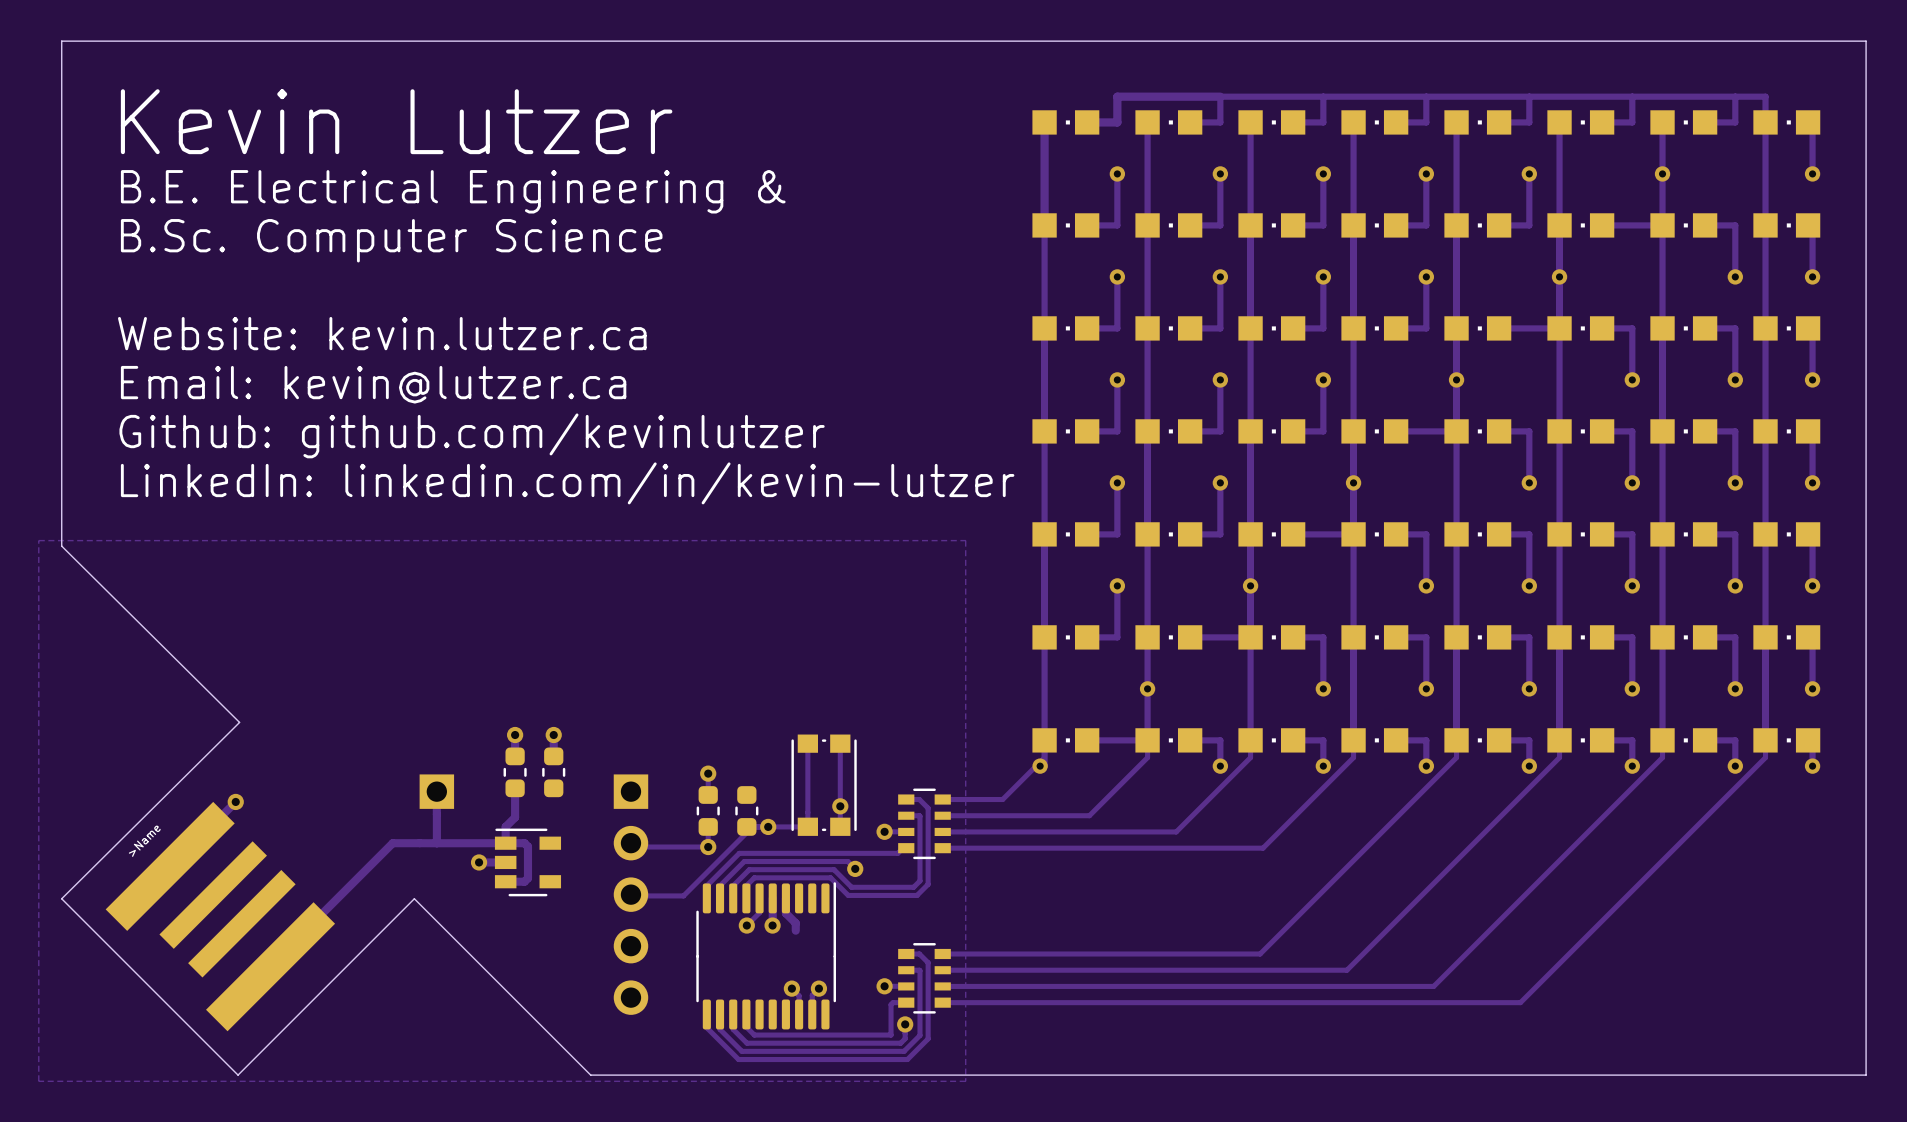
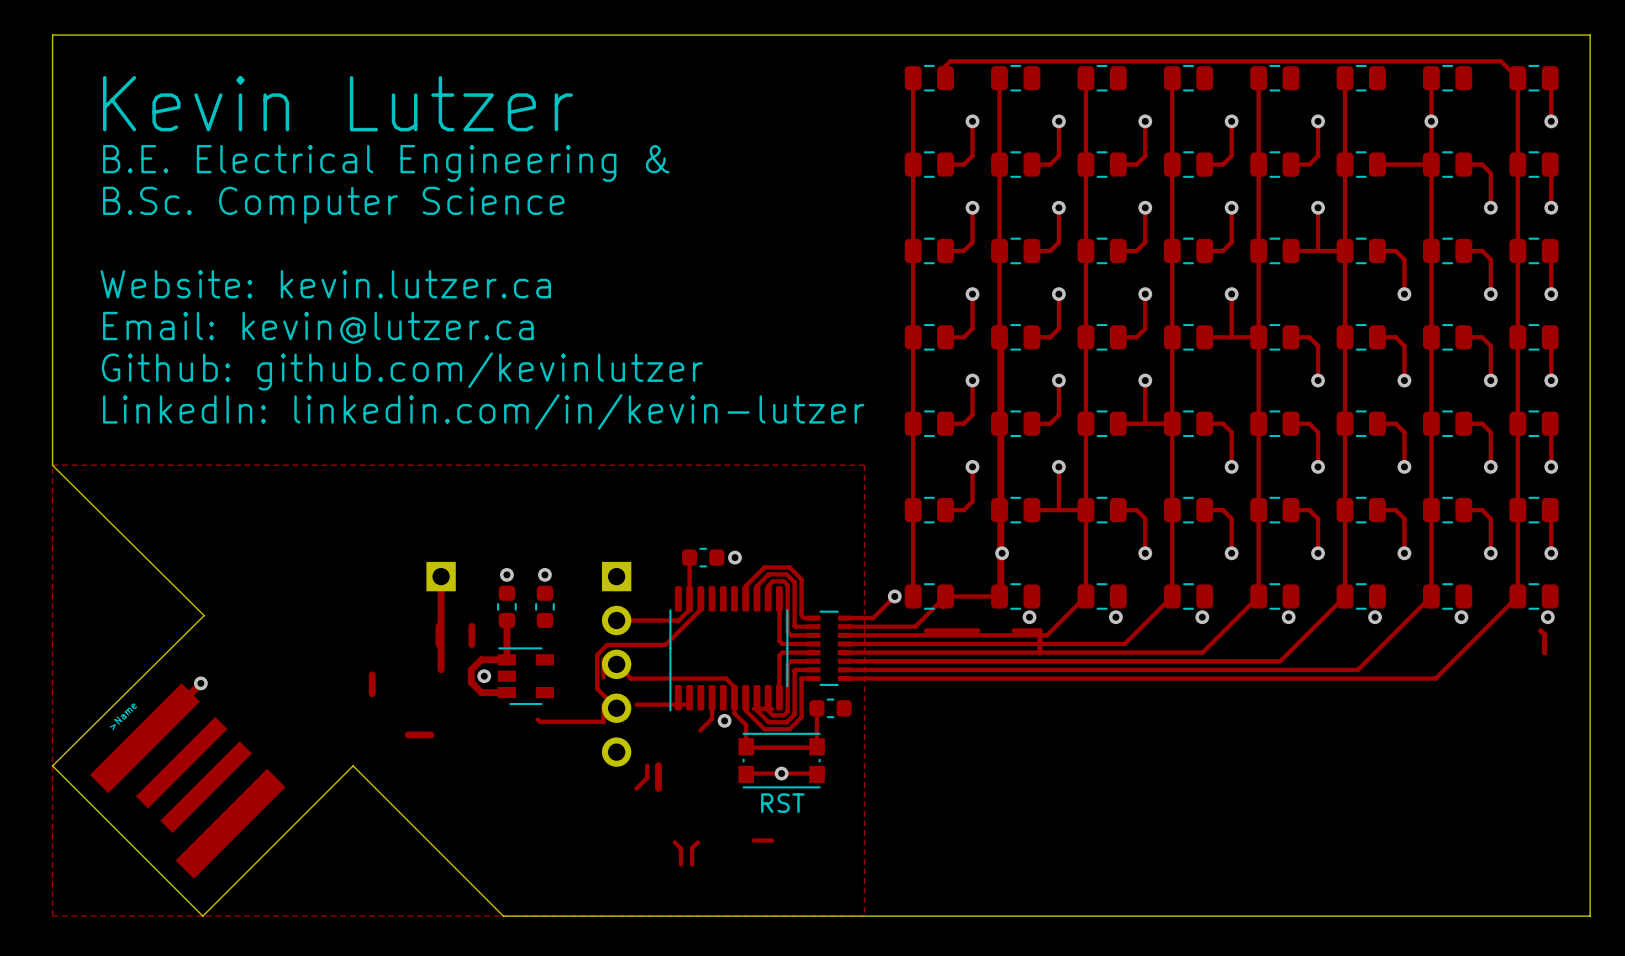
track: none -> (913, 78) (913, 596)
part: none -> (929, 78)
track: none -> (945, 78) (945, 66) (950, 61) (1500, 61) (1517, 78) (1517, 596) (1435, 678) (844, 678)
track: none -> (999, 78) (999, 596)
part: none -> (1015, 78)
track: none -> (1085, 78) (1085, 596) (1047, 635) (844, 635)
part: none -> (1102, 78)
track: none -> (1172, 78) (1172, 596) (1124, 643) (844, 643)
part: none -> (1188, 78)
track: none -> (1258, 78) (1258, 596) (1202, 652) (844, 652)
part: none -> (1274, 78)
track: none -> (1345, 78) (1345, 596) (1280, 661) (844, 661)
part: none -> (1361, 78)
track: none -> (1431, 78) (1431, 596) (1357, 669) (844, 669)
part: none -> (1447, 78)
part: none -> (1533, 78)
track: none -> (1547, 78) (1551, 81) (1551, 121)
track: (1220, 96) (1220, 122) (1190, 122) -> none
track: (1220, 96) (1765, 96) (1765, 757) (1520, 1002) (942, 1002) -> none
track: (1220, 96) (1117, 96) (1117, 122) (1087, 122) -> none
track: (1323, 96) (1323, 122) (1293, 122) -> none
track: (1426, 96) (1426, 122) (1396, 122) -> none
track: (1529, 96) (1529, 122) (1499, 122) -> none
track: (1632, 96) (1632, 122) (1602, 122) -> none
track: (1735, 96) (1735, 122) (1705, 122) -> none
track: (1044, 122) (1044, 766) (1040, 766) -> none
part: (1065, 122) -> none
track: (1147, 122) (1147, 757) (1089, 815) (942, 815) -> none
part: (1168, 122) -> none
track: (1250, 122) (1250, 757) (1176, 831) (942, 831) -> none
part: (1271, 122) -> none
track: (1353, 122) (1353, 757) (1263, 848) (942, 848) -> none
part: (1374, 122) -> none
track: (1456, 122) (1456, 757) (1260, 953) (942, 953) -> none
part: (1477, 122) -> none
track: (1559, 122) (1559, 757) (1346, 970) (942, 970) -> none
part: (1580, 122) -> none
track: (1662, 122) (1662, 757) (1433, 986) (942, 986) -> none
part: (1683, 122) -> none
part: (1786, 122) -> none
track: (1808, 122) (1812, 122) (1812, 173) -> none
track: none -> (972, 121) (972, 155) (963, 164) (942, 164)
via: none -> (972, 121)
track: none -> (1058, 121) (1058, 155) (1050, 164) (1029, 164)
via: none -> (1058, 121)
track: none -> (1145, 121) (1145, 155) (1136, 164) (1115, 164)
via: none -> (1145, 121)
track: none -> (1231, 121) (1231, 155) (1223, 164) (1202, 164)
via: none -> (1231, 121)
track: none -> (1318, 121) (1318, 155) (1309, 164) (1288, 164)
via: none -> (1318, 121)
via: none -> (1431, 121)
via: none -> (1551, 121)
track: (1117, 173) (1117, 225) (1087, 225) -> none
via: (1117, 173) -> none
track: (1220, 173) (1220, 225) (1190, 225) -> none
via: (1220, 173) -> none
track: (1323, 173) (1323, 225) (1293, 225) -> none
via: (1323, 173) -> none
track: (1426, 173) (1426, 225) (1396, 225) -> none
via: (1426, 173) -> none
track: (1529, 173) (1529, 225) (1499, 225) -> none
via: (1529, 173) -> none
via: (1662, 173) -> none
via: (1812, 173) -> none
part: none -> (929, 164)
part: none -> (1015, 164)
part: none -> (1102, 164)
part: none -> (1188, 164)
part: none -> (1274, 164)
part: none -> (1361, 164)
track: none -> (1374, 164) (1434, 164)
part: none -> (1447, 164)
track: none -> (1463, 164) (1482, 164) (1490, 173) (1490, 207)
part: none -> (1533, 164)
track: none -> (1547, 164) (1551, 168) (1551, 207)
part: (1065, 225) -> none
part: (1168, 225) -> none
part: (1271, 225) -> none
part: (1374, 225) -> none
part: (1477, 225) -> none
part: (1580, 225) -> none
track: (1602, 225) (1662, 225) -> none
part: (1683, 225) -> none
track: (1705, 225) (1735, 225) (1735, 276) -> none
part: (1786, 225) -> none
track: (1808, 225) (1812, 225) (1812, 276) -> none
track: none -> (972, 207) (972, 242) (963, 250) (942, 250)
via: none -> (972, 207)
track: none -> (1058, 207) (1058, 242) (1050, 250) (1029, 250)
via: none -> (1058, 207)
track: none -> (1145, 207) (1145, 242) (1136, 250) (1115, 250)
via: none -> (1145, 207)
track: none -> (1231, 207) (1231, 242) (1223, 250) (1202, 250)
via: none -> (1231, 207)
track: none -> (1318, 207) (1318, 250)
via: none -> (1318, 207)
via: none -> (1490, 207)
via: none -> (1551, 207)
track: (1117, 276) (1117, 328) (1087, 328) -> none
via: (1117, 276) -> none
track: (1220, 276) (1220, 328) (1190, 328) -> none
via: (1220, 276) -> none
track: (1323, 276) (1323, 328) (1293, 328) -> none
via: (1323, 276) -> none
track: (1426, 276) (1426, 328) (1396, 328) -> none
via: (1426, 276) -> none
via: (1559, 276) -> none
via: (1735, 276) -> none
via: (1812, 276) -> none
part: none -> (929, 250)
part: none -> (1015, 250)
part: none -> (1102, 250)
part: none -> (1188, 250)
part: none -> (1274, 250)
track: none -> (1288, 250) (1347, 250)
part: none -> (1361, 250)
track: none -> (1377, 250) (1395, 250) (1404, 259) (1404, 294)
part: none -> (1447, 250)
track: none -> (1463, 250) (1482, 250) (1490, 259) (1490, 294)
part: none -> (1533, 250)
track: none -> (1547, 250) (1551, 254) (1551, 294)
part: (1065, 328) -> none
part: (1168, 328) -> none
part: (1271, 328) -> none
part: (1374, 328) -> none
part: (1477, 328) -> none
track: (1499, 328) (1559, 328) -> none
part: (1580, 328) -> none
track: (1602, 328) (1632, 328) (1632, 379) -> none
part: (1683, 328) -> none
track: (1705, 328) (1735, 328) (1735, 379) -> none
part: (1786, 328) -> none
track: (1808, 328) (1812, 328) (1812, 379) -> none
track: none -> (972, 294) (972, 328) (963, 337) (942, 337)
via: none -> (972, 294)
track: none -> (1058, 294) (1058, 328) (1050, 337) (1029, 337)
via: none -> (1058, 294)
track: none -> (1145, 294) (1145, 328) (1136, 337) (1115, 337)
via: none -> (1145, 294)
track: none -> (1231, 294) (1231, 337)
via: none -> (1231, 294)
via: none -> (1404, 294)
via: none -> (1490, 294)
via: none -> (1551, 294)
track: (1117, 379) (1117, 431) (1087, 431) -> none
via: (1117, 379) -> none
track: (1220, 379) (1220, 431) (1190, 431) -> none
via: (1220, 379) -> none
track: (1323, 379) (1323, 431) (1293, 431) -> none
via: (1323, 379) -> none
via: (1456, 379) -> none
via: (1632, 379) -> none
via: (1735, 379) -> none
via: (1812, 379) -> none
track: none -> (1002, 330) (1002, 596) (942, 596) (942, 607)
part: none -> (929, 337)
part: none -> (1015, 337)
part: none -> (1102, 337)
part: none -> (1188, 337)
track: none -> (1202, 337) (1261, 337)
part: none -> (1274, 337)
track: none -> (1291, 337) (1309, 337) (1318, 345) (1318, 380)
part: none -> (1361, 337)
track: none -> (1377, 337) (1395, 337) (1404, 345) (1404, 380)
part: none -> (1447, 337)
track: none -> (1463, 337) (1482, 337) (1490, 345) (1490, 380)
part: none -> (1533, 337)
track: none -> (1550, 337) (1551, 380)
part: (1065, 431) -> none
part: (1168, 431) -> none
part: (1271, 431) -> none
part: (1374, 431) -> none
track: (1396, 431) (1456, 431) -> none
part: (1477, 431) -> none
track: (1499, 431) (1529, 431) (1529, 482) -> none
part: (1580, 431) -> none
track: (1602, 431) (1632, 431) (1632, 482) -> none
part: (1683, 431) -> none
track: (1705, 431) (1735, 431) (1735, 482) -> none
part: (1786, 431) -> none
track: (1808, 431) (1812, 431) (1812, 482) -> none
track: none -> (972, 380) (972, 415) (963, 423) (942, 423)
via: none -> (972, 380)
track: none -> (1058, 380) (1058, 415) (1050, 423) (1029, 423)
via: none -> (1058, 380)
track: none -> (1145, 380) (1145, 423)
via: none -> (1145, 380)
via: none -> (1318, 380)
via: none -> (1404, 380)
via: none -> (1490, 380)
via: none -> (1551, 380)
track: (1117, 482) (1117, 534) (1087, 534) -> none
via: (1117, 482) -> none
track: (1220, 482) (1220, 534) (1190, 534) -> none
via: (1220, 482) -> none
via: (1353, 482) -> none
via: (1529, 482) -> none
via: (1632, 482) -> none
via: (1735, 482) -> none
via: (1812, 482) -> none
part: none -> (929, 423)
part: none -> (1015, 423)
part: none -> (1102, 423)
track: none -> (1115, 423) (1174, 423)
part: none -> (1188, 423)
track: none -> (1204, 423) (1223, 423) (1231, 432) (1231, 466)
part: none -> (1274, 423)
track: none -> (1291, 423) (1309, 423) (1318, 432) (1318, 466)
part: none -> (1361, 423)
track: none -> (1377, 423) (1395, 423) (1404, 432) (1404, 466)
part: none -> (1447, 423)
track: none -> (1463, 423) (1482, 423) (1490, 432) (1490, 466)
part: none -> (1533, 423)
track: none -> (1550, 423) (1551, 466)
part: (1065, 534) -> none
part: (1168, 534) -> none
part: (1271, 534) -> none
track: (1293, 534) (1353, 534) -> none
part: (1374, 534) -> none
track: (1396, 534) (1426, 534) (1426, 585) -> none
part: (1477, 534) -> none
track: (1499, 534) (1529, 534) (1529, 585) -> none
part: (1580, 534) -> none
track: (1602, 534) (1632, 534) (1632, 585) -> none
part: (1683, 534) -> none
track: (1705, 534) (1735, 534) (1735, 585) -> none
part: (1786, 534) -> none
track: (1808, 534) (1812, 534) (1812, 585) -> none
zone outline: (38, 540) (38, 1081) (965, 1081) (965, 540) (38, 540) -> (52, 465) (52, 916) (864, 916) (864, 465) (52, 465)
track: none -> (972, 466) (972, 501) (963, 510) (942, 510)
via: none -> (972, 466)
track: none -> (1058, 466) (1058, 510)
via: none -> (1058, 466)
via: none -> (1231, 466)
via: none -> (1318, 466)
via: none -> (1404, 466)
via: none -> (1490, 466)
via: none -> (1551, 466)
track: (1117, 585) (1117, 637) (1087, 637) -> none
via: (1117, 585) -> none
via: (1250, 585) -> none
via: (1426, 585) -> none
via: (1529, 585) -> none
via: (1632, 585) -> none
via: (1735, 585) -> none
via: (1812, 585) -> none
part: none -> (929, 510)
part: none -> (1015, 510)
track: none -> (1029, 510) (1088, 510)
part: none -> (1102, 510)
track: none -> (1118, 510) (1136, 510) (1145, 518) (1145, 553)
part: none -> (1188, 510)
track: none -> (1204, 510) (1223, 510) (1231, 518) (1231, 553)
part: none -> (1274, 510)
track: none -> (1291, 510) (1309, 510) (1318, 518) (1318, 553)
part: none -> (1361, 510)
track: none -> (1377, 510) (1395, 510) (1404, 518) (1404, 553)
part: none -> (1447, 510)
track: none -> (1463, 510) (1482, 510) (1490, 518) (1490, 553)
part: none -> (1533, 510)
track: none -> (1547, 510) (1551, 513) (1551, 553)
part: (1065, 637) -> none
part: (1168, 637) -> none
track: (1190, 637) (1250, 637) -> none
part: (1271, 637) -> none
track: (1293, 637) (1323, 637) (1323, 688) -> none
part: (1374, 637) -> none
track: (1396, 637) (1426, 637) (1426, 688) -> none
part: (1477, 637) -> none
track: (1499, 637) (1529, 637) (1529, 688) -> none
part: (1580, 637) -> none
track: (1602, 637) (1632, 637) (1632, 688) -> none
part: (1683, 637) -> none
track: (1705, 637) (1735, 637) (1735, 688) -> none
part: (1786, 637) -> none
track: (1808, 637) (1812, 637) (1812, 688) -> none
via: none -> (1002, 553)
via: none -> (1145, 553)
via: none -> (1231, 553)
via: none -> (1318, 553)
via: none -> (1404, 553)
via: none -> (1490, 553)
via: none -> (1551, 553)
part: none -> (703, 557)
via: none -> (734, 557)
track: none -> (689, 561) (689, 609) (678, 620) (616, 620)
via: none -> (506, 574)
via: none -> (544, 574)
track: none -> (441, 576) (441, 669)
via: (1147, 688) -> none
via: (1323, 688) -> none
via: (1426, 688) -> none
via: (1529, 688) -> none
via: (1632, 688) -> none
via: (1735, 688) -> none
via: (1812, 688) -> none
track: none -> (894, 596) (873, 618) (844, 618)
via: none -> (894, 596)
part: none -> (929, 596)
track: none -> (945, 596) (915, 626) (844, 626)
part: none -> (1015, 596)
part: none -> (1102, 596)
part: none -> (1188, 596)
part: none -> (1274, 596)
part: none -> (1361, 596)
part: none -> (1447, 596)
part: none -> (1533, 596)
track: none -> (700, 598) (700, 609) (665, 644) (607, 644) (597, 655) (597, 688) (616, 708)
track: none -> (745, 598) (745, 586) (764, 567) (789, 567) (801, 579) (801, 615) (804, 618) (810, 618)
track: none -> (756, 598) (756, 586) (768, 574) (786, 574) (794, 582) (794, 625) (810, 626)
track: none -> (768, 598) (768, 586) (772, 581) (783, 581) (787, 585) (787, 631) (791, 635) (810, 635)
track: none -> (779, 598) (779, 640) (782, 643) (810, 643)
part: none -> (506, 606)
part: none -> (544, 606)
via: none -> (1029, 617)
via: none -> (1115, 617)
via: none -> (1202, 617)
via: none -> (1288, 617)
via: none -> (1375, 617)
via: none -> (1461, 617)
via: none -> (1547, 617)
track: none -> (506, 620) (506, 659) (481, 659) (471, 669) (471, 682) (481, 692) (506, 692)
via: (515, 735) -> none
via: (553, 735) -> none
track: (1044, 740) (1044, 757) (1002, 799) (942, 799) -> none
part: (1065, 740) -> none
part: (1168, 740) -> none
part: (1271, 740) -> none
track: (1293, 740) (1323, 740) (1323, 766) -> none
part: (1374, 740) -> none
track: (1396, 740) (1426, 740) (1426, 766) -> none
part: (1477, 740) -> none
track: (1499, 740) (1529, 740) (1529, 766) -> none
part: (1580, 740) -> none
track: (1602, 740) (1632, 740) (1632, 766) -> none
part: (1683, 740) -> none
track: (1705, 740) (1735, 740) (1735, 766) -> none
part: (1786, 740) -> none
track: (807, 743) (807, 826) -> none
track: (840, 743) (840, 826) -> none
part: none -> (829, 648)
track: none -> (810, 652) (782, 652) (779, 655) (779, 697)
via: (1040, 766) -> none
via: (1220, 766) -> none
via: (1323, 766) -> none
via: (1426, 766) -> none
via: (1529, 766) -> none
via: (1632, 766) -> none
via: (1735, 766) -> none
via: (1812, 766) -> none
part: (515, 772) -> none
part: (553, 772) -> none
via: (708, 773) -> none
track: none -> (810, 661) (791, 661) (787, 664) (787, 711) (783, 715) (772, 715) (768, 710) (768, 697)
track: none -> (616, 664) (630, 678) (726, 678) (734, 687) (734, 713) (746, 725) (746, 746)
part rotation: 0° (824, 785) -> 90° clockwise (781, 760)
part position: (824, 785) -> (781, 760)
track: none -> (810, 669) (794, 670) (794, 714) (786, 722) (768, 722) (756, 710) (756, 697)
track: (515, 788) (515, 817) (505, 826) (505, 843) -> none
part position: (436, 791) -> (441, 576)
via: none -> (484, 676)
track: none -> (810, 678) (801, 678) (801, 717) (789, 729) (764, 729) (745, 710) (745, 697)
track: (906, 799) (919, 799) (928, 808) (928, 884) (917, 895) (848, 895) (830, 877) (754, 877) (746, 885) (746, 898) -> none
via: (840, 806) -> none
part: (708, 810) -> none
part: (746, 810) -> none
track: (436, 814) (436, 843) -> none
track: (906, 815) (919, 816) (919, 880) (913, 887) (851, 887) (834, 869) (749, 869) (733, 885) (733, 898) -> none
track: none -> (712, 697) (712, 718) (700, 730)
part: (924, 823) -> none
track: (752, 826) (683, 895) (630, 895) -> none
via: (768, 826) -> none
track: none -> (816, 707) (816, 744)
via: (884, 831) -> none
part: none -> (830, 708)
track: (436, 843) (392, 843) (322, 913) -> none
track: (505, 843) (524, 843) (527, 846) (527, 878) (524, 881) (505, 881) -> none
track: (505, 843) (436, 843) -> none
via: none -> (724, 720)
via: (708, 847) -> none
track: (906, 848) (903, 848) (897, 853) (739, 853) (706, 885) (706, 898) -> none
via: (479, 862) -> none
part position: (527, 862) -> (525, 676)
track: (855, 868) (847, 861) (744, 861) (720, 885) (720, 898) -> none
via: (855, 868) -> none
track: none -> (746, 747) (817, 747)
part position: (630, 894) -> (616, 664)
track: (785, 898) (785, 913) (795, 923) (795, 930) -> none
track: none -> (749, 773) (820, 773)
via: none -> (781, 773)
via: (746, 925) -> none
via: (772, 925) -> none
text: none -> RST (782, 803)
track: (906, 953) (919, 953) (928, 962) (928, 1038) (907, 1059) (738, 1059) (706, 1027) (706, 1014) -> none
part rotation: 0° (766, 955) -> 180° (728, 648)
part position: (766, 955) -> (728, 648)
track: (906, 970) (919, 970) (919, 1035) (904, 1051) (741, 1051) (720, 1029) (720, 1014) -> none
part: (924, 978) -> none
via: (884, 986) -> none
via: (791, 988) -> none
via: (818, 988) -> none
track: (906, 1002) (893, 1002) (891, 1004) (891, 1035) (754, 1035) (746, 1027) (746, 1014) -> none
track: (733, 1014) (733, 1029) (746, 1043) (900, 1043) (905, 1038) (905, 1024) -> none
via: (905, 1024) -> none

